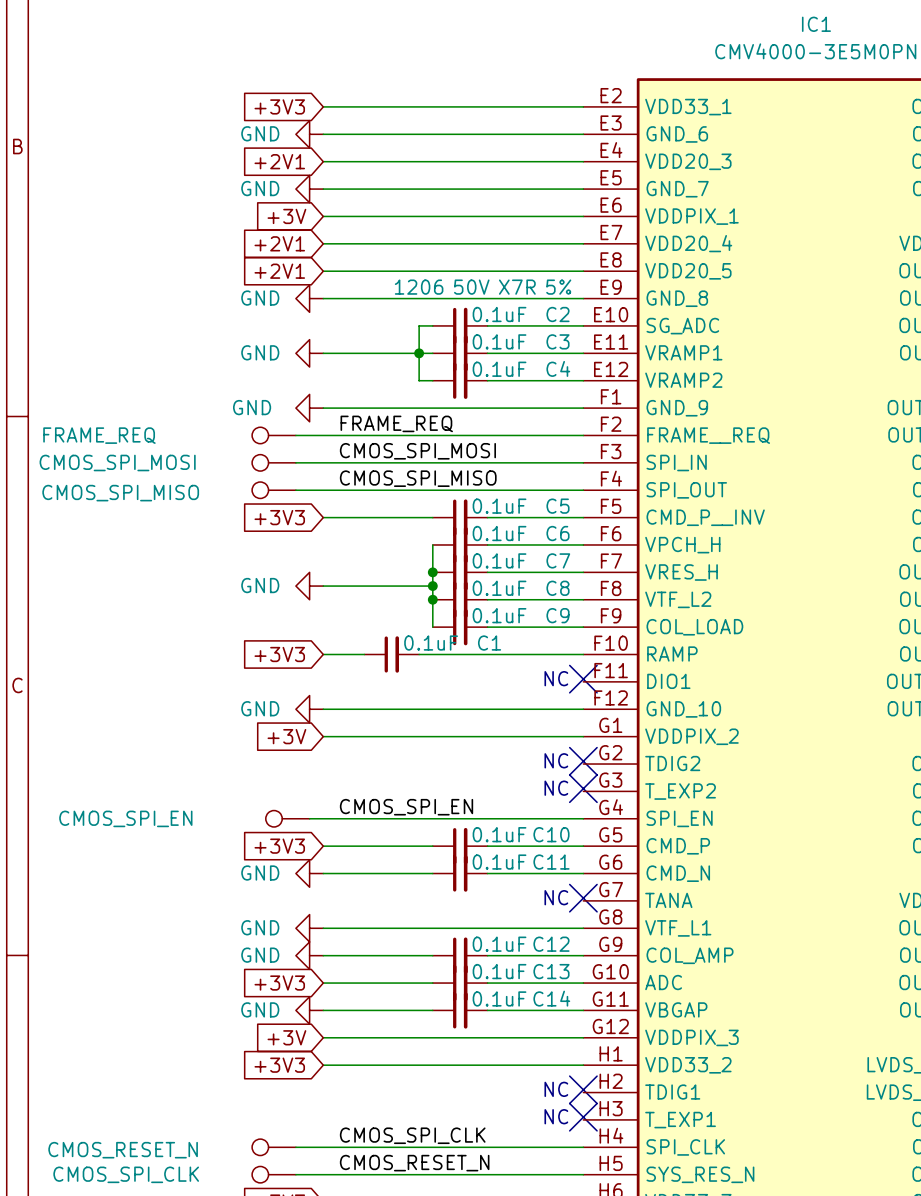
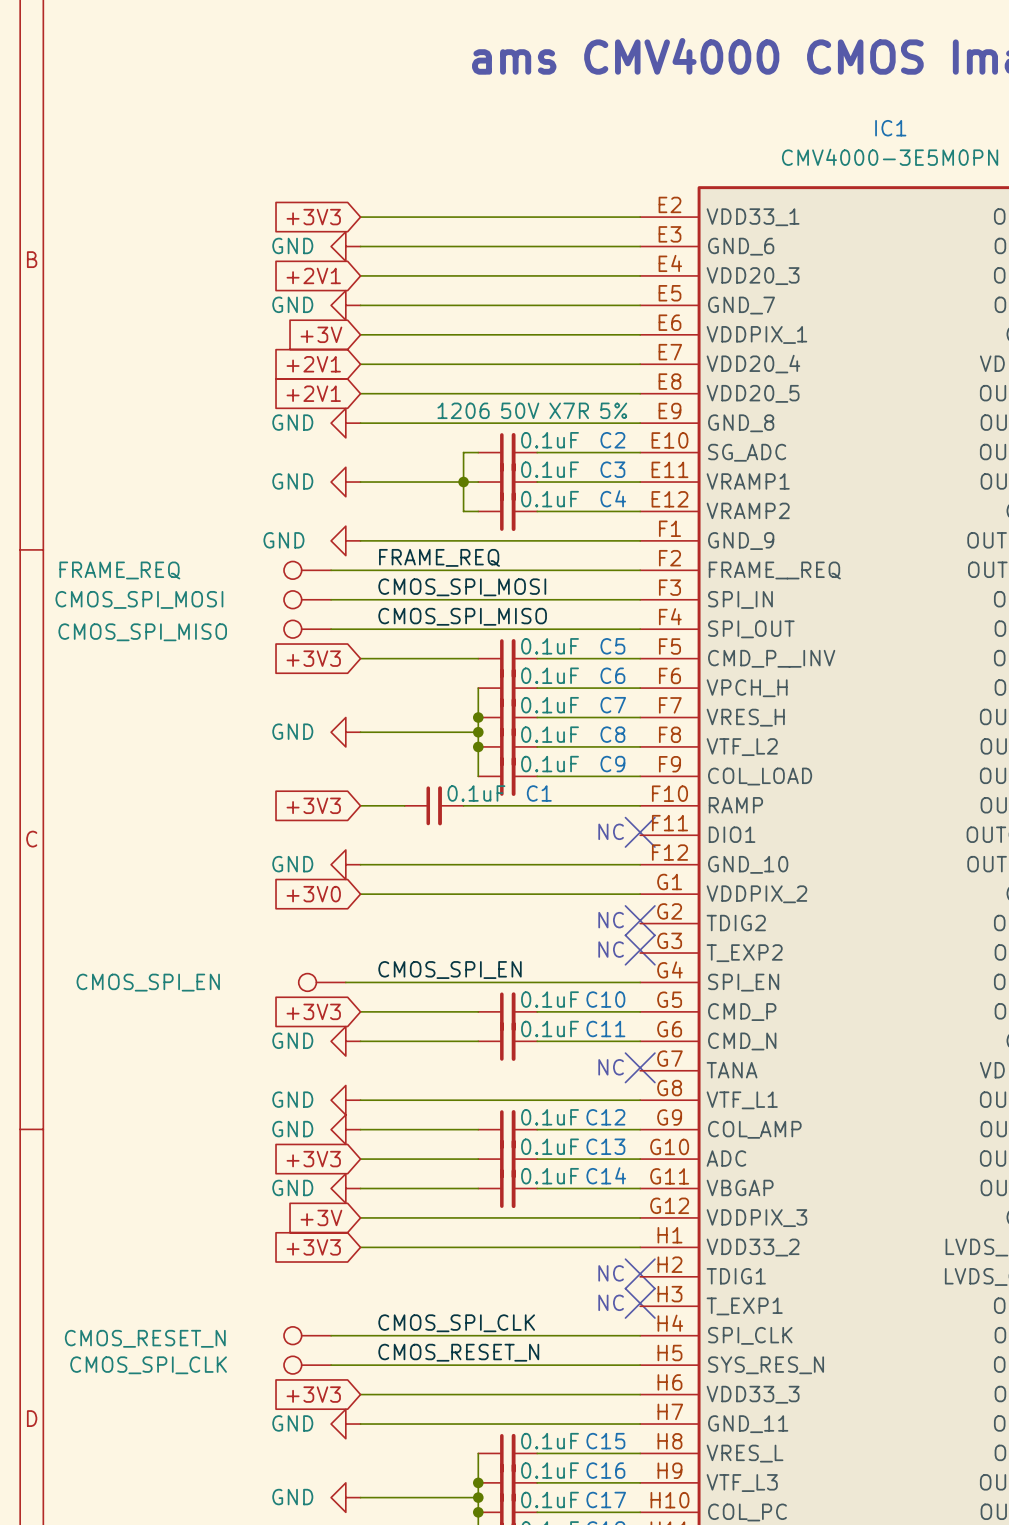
global label: +3V (286, 736) -> +3V0 (313, 894)

